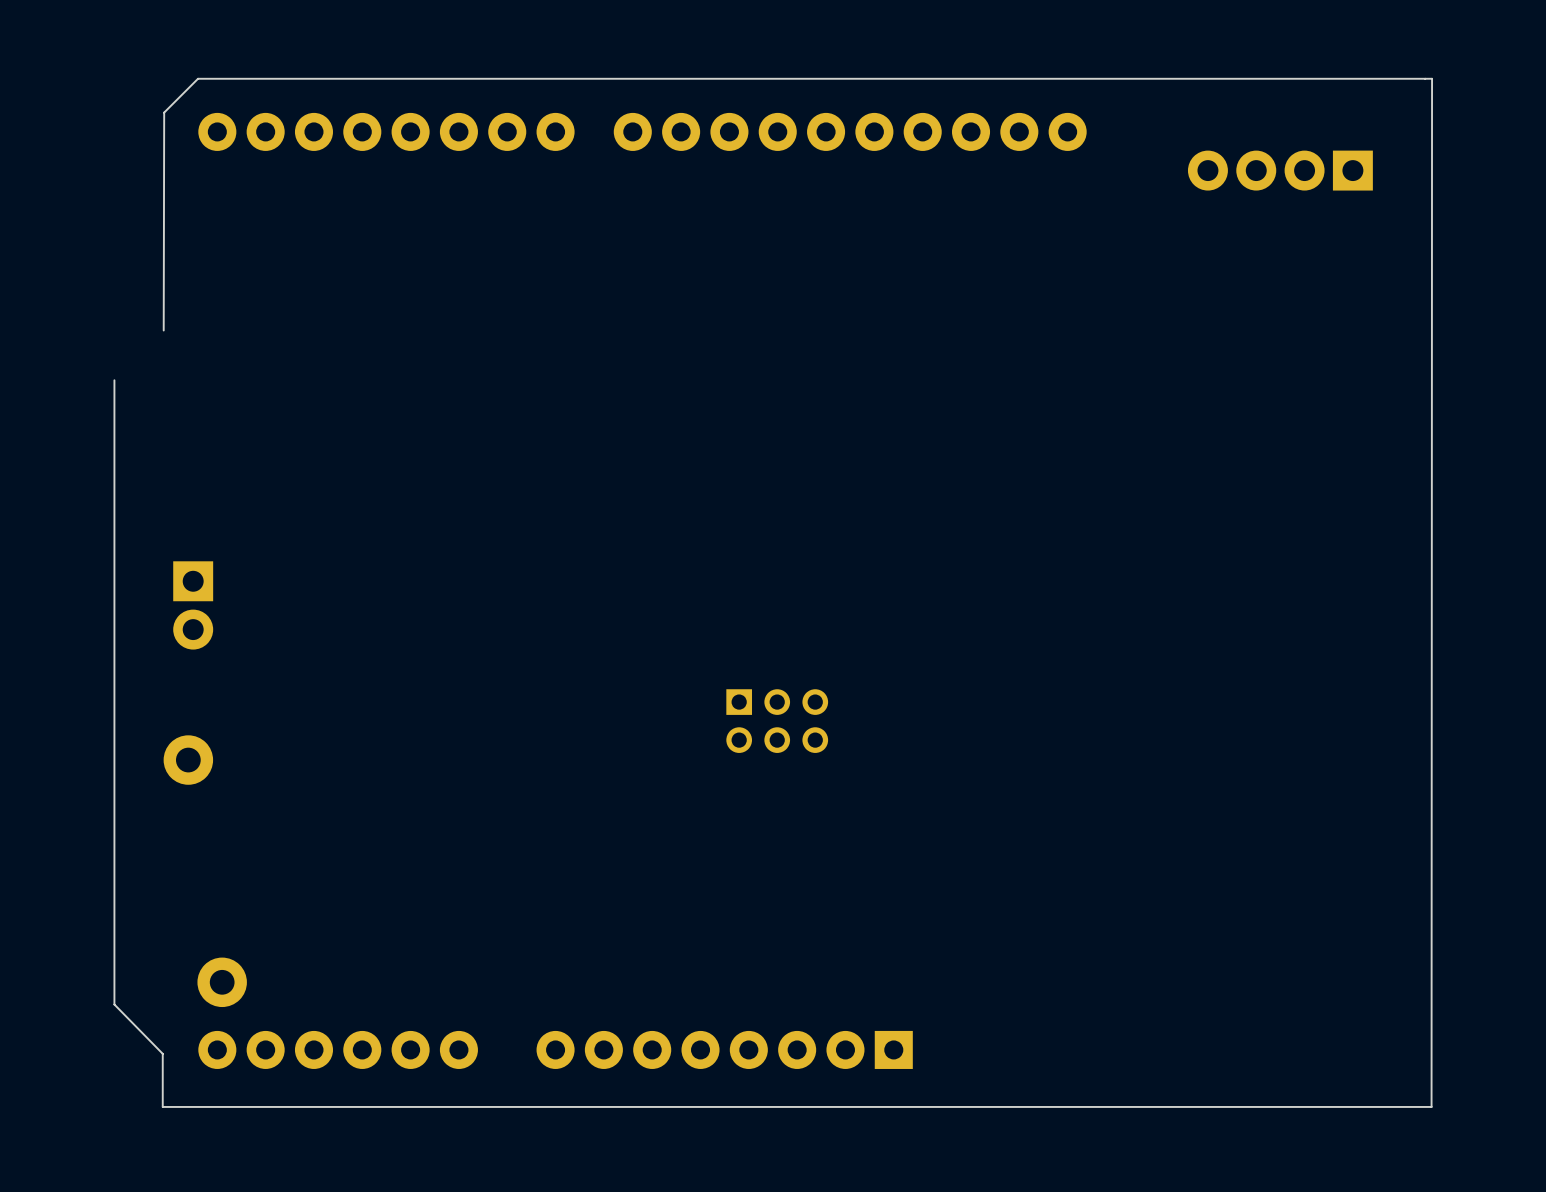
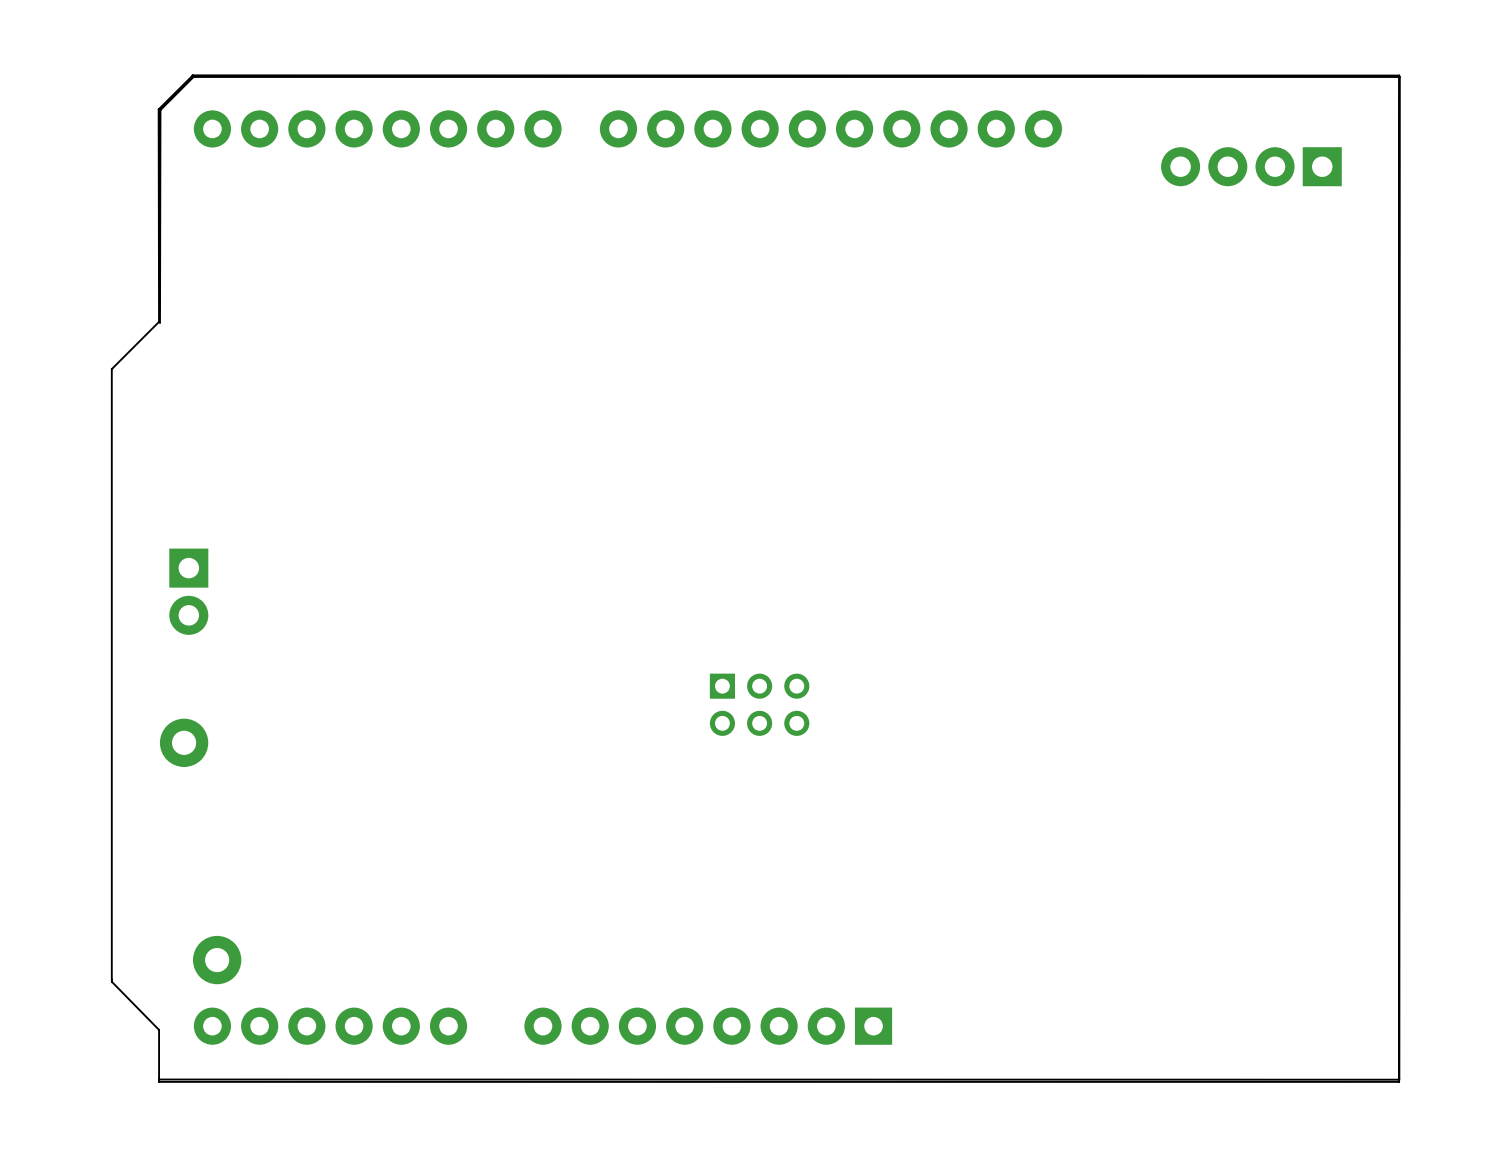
board edge: none -> (111, 371) (111, 369) (159, 321) (158, 109) (192, 75) (1399, 75) (1399, 1079) (159, 1079)

